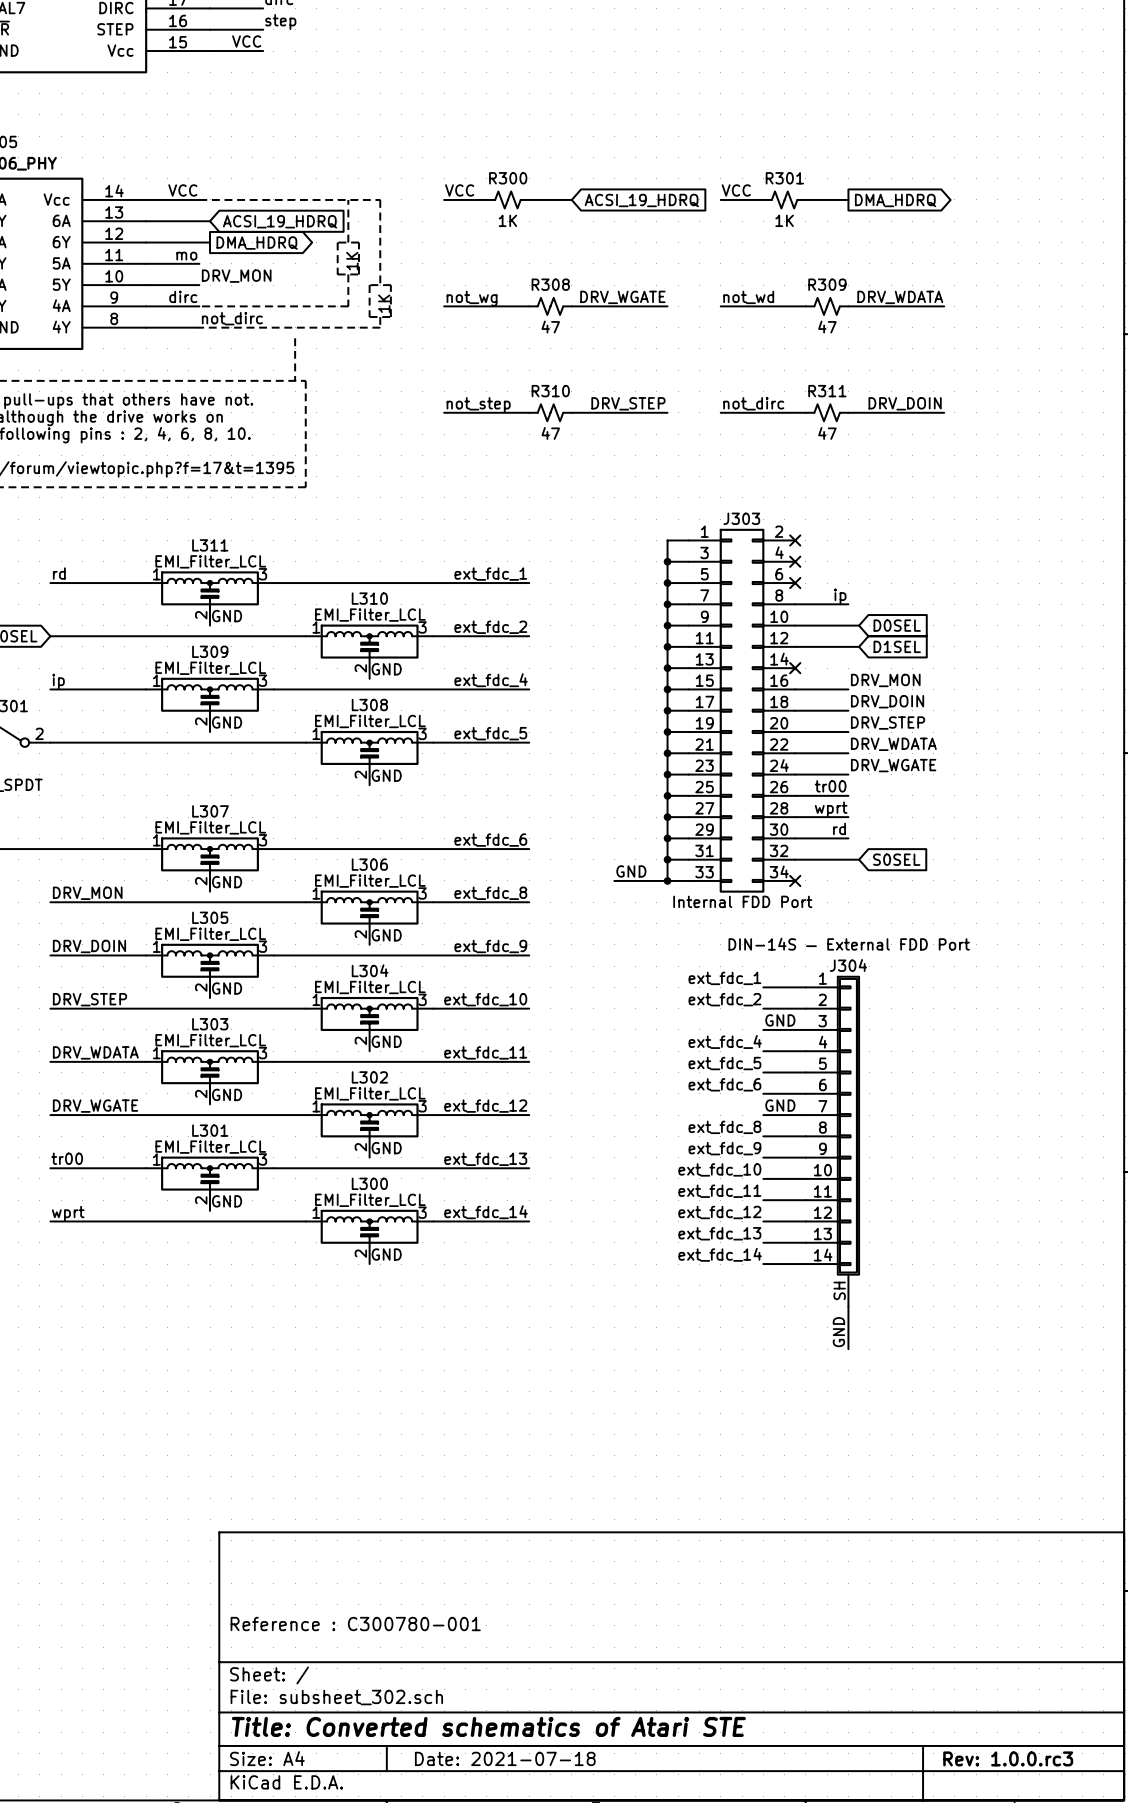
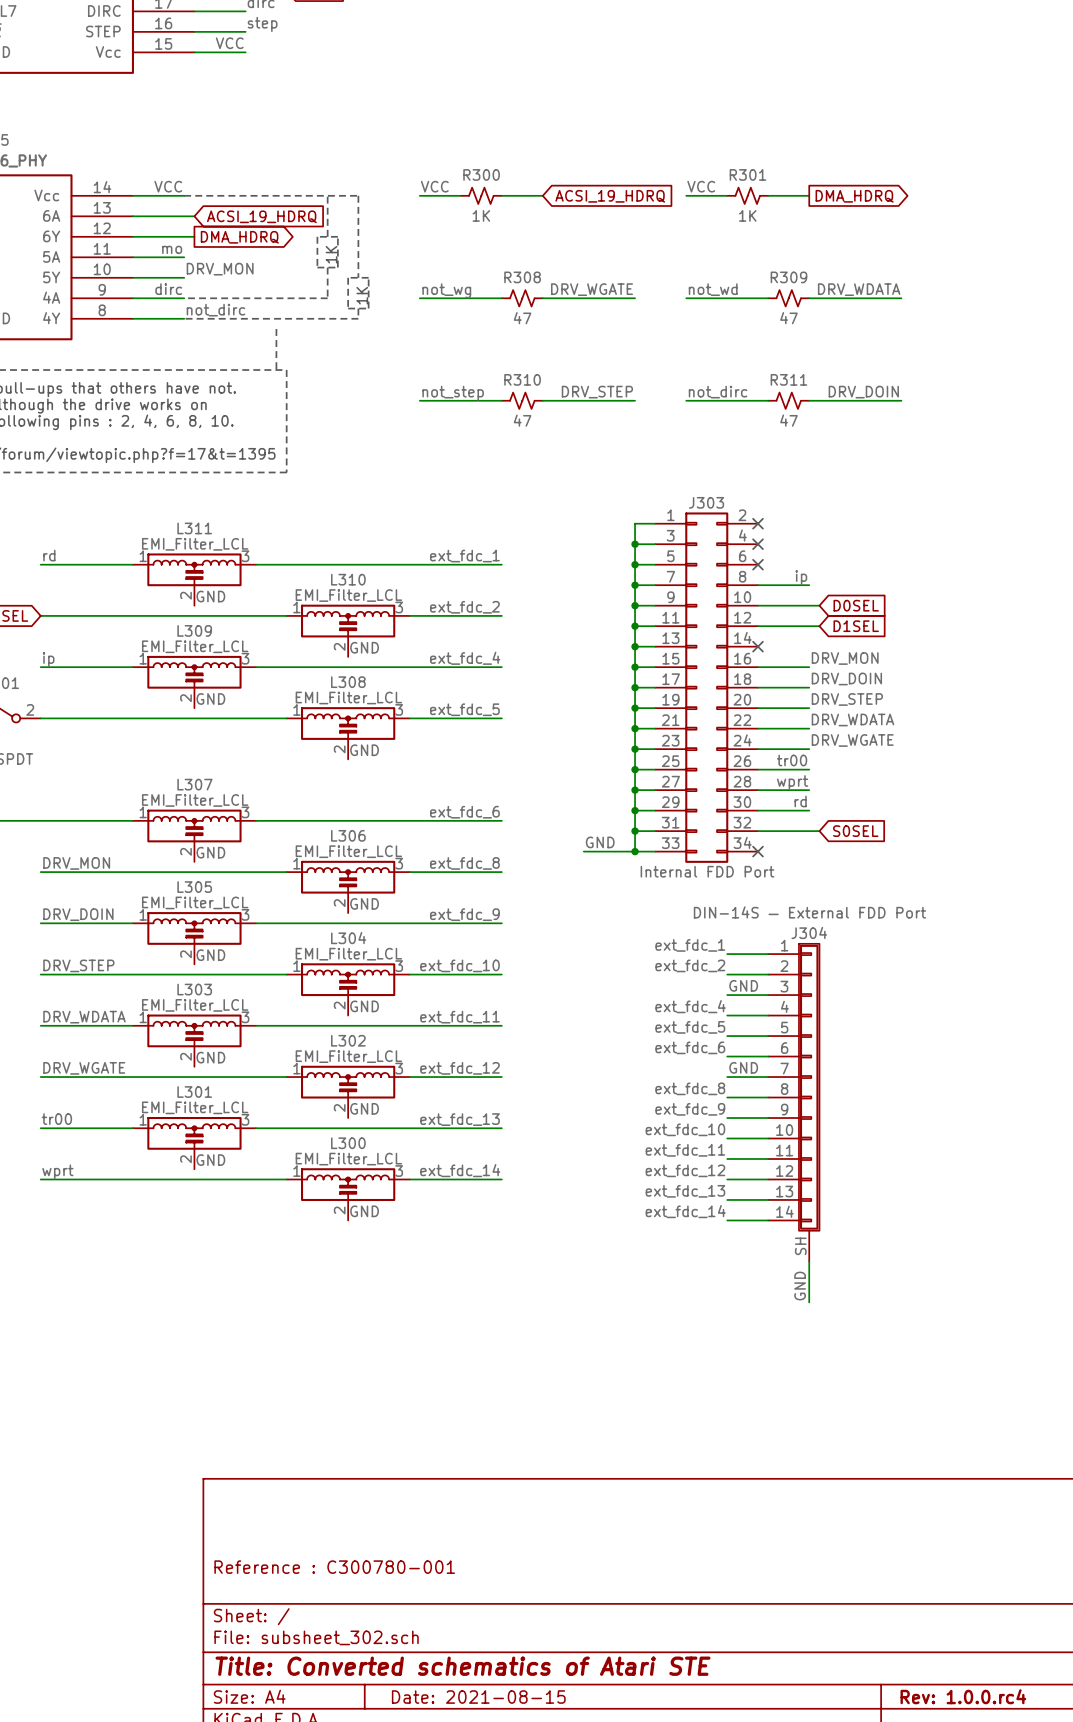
title block: Date: 2021-07-18 (505, 1758) -> Date: 2021-08-15 (478, 1697)
title block: Rev: 1.0.0.rc3 (1008, 1758) -> Rev: 1.0.0.rc4 (963, 1696)

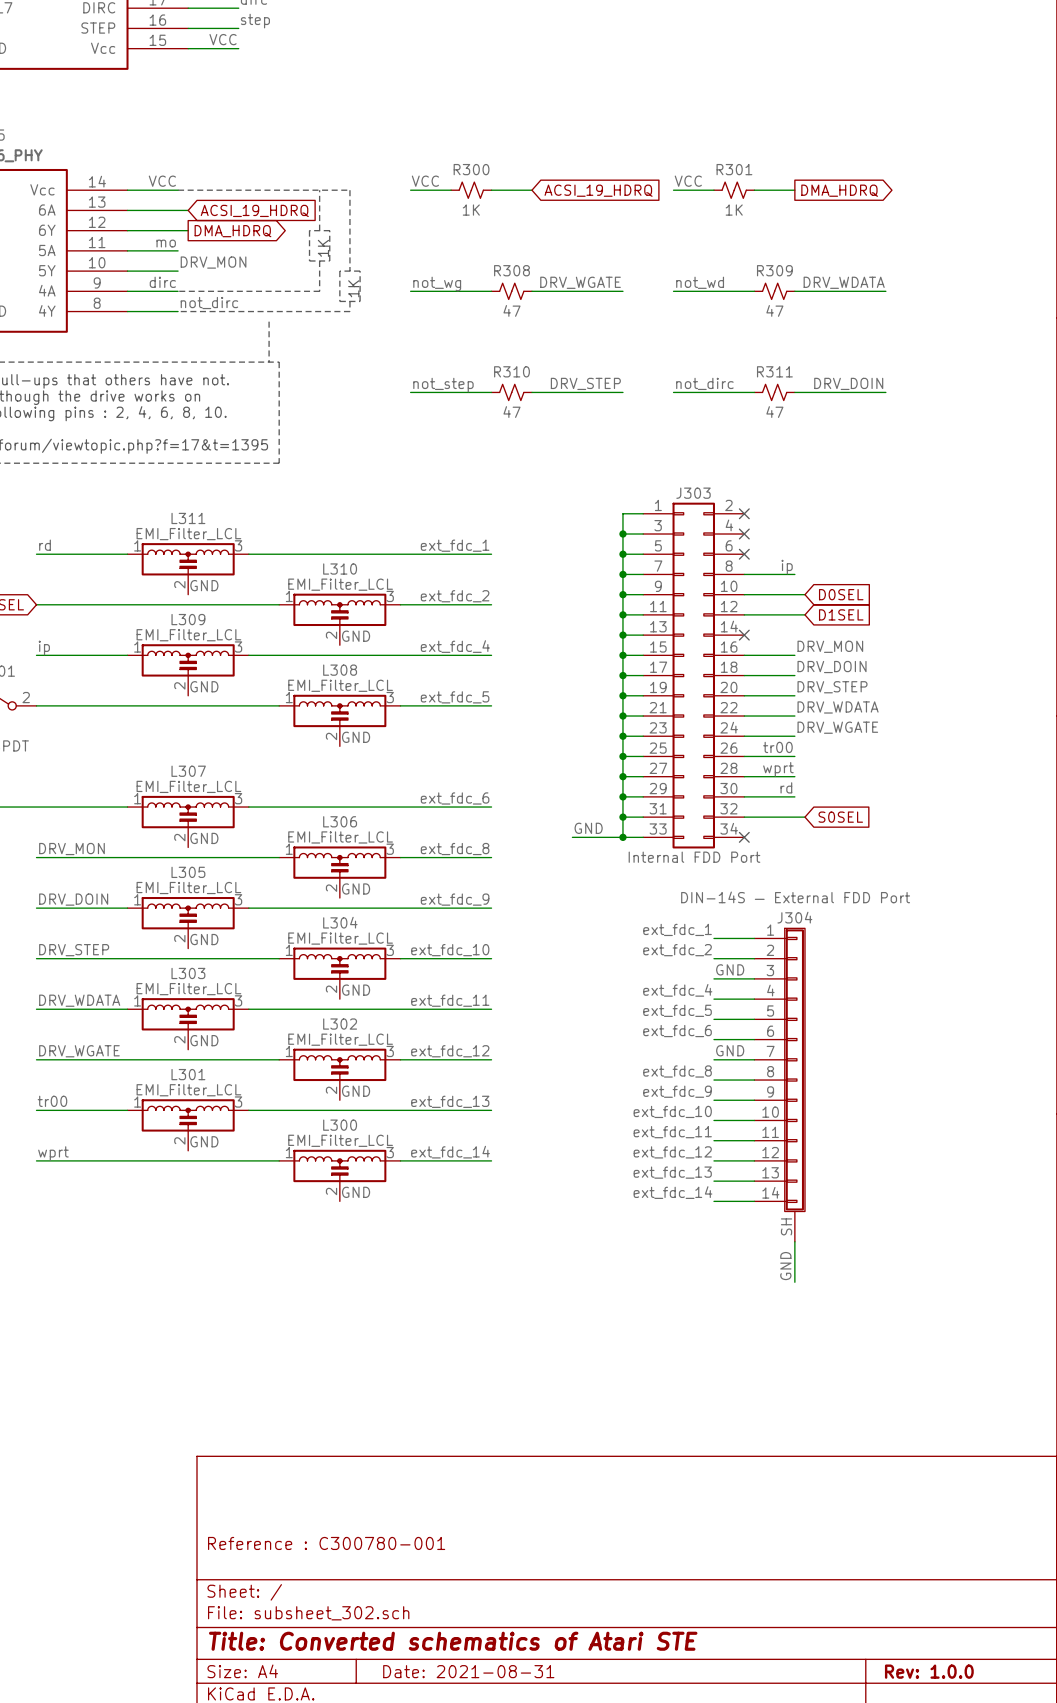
title block: Rev: 1.0.0.rc4 (963, 1696) -> Rev: 1.0.0 (929, 1671)
title block: Date: 2021-08-15 (478, 1697) -> Date: 2021-08-31 (468, 1671)

